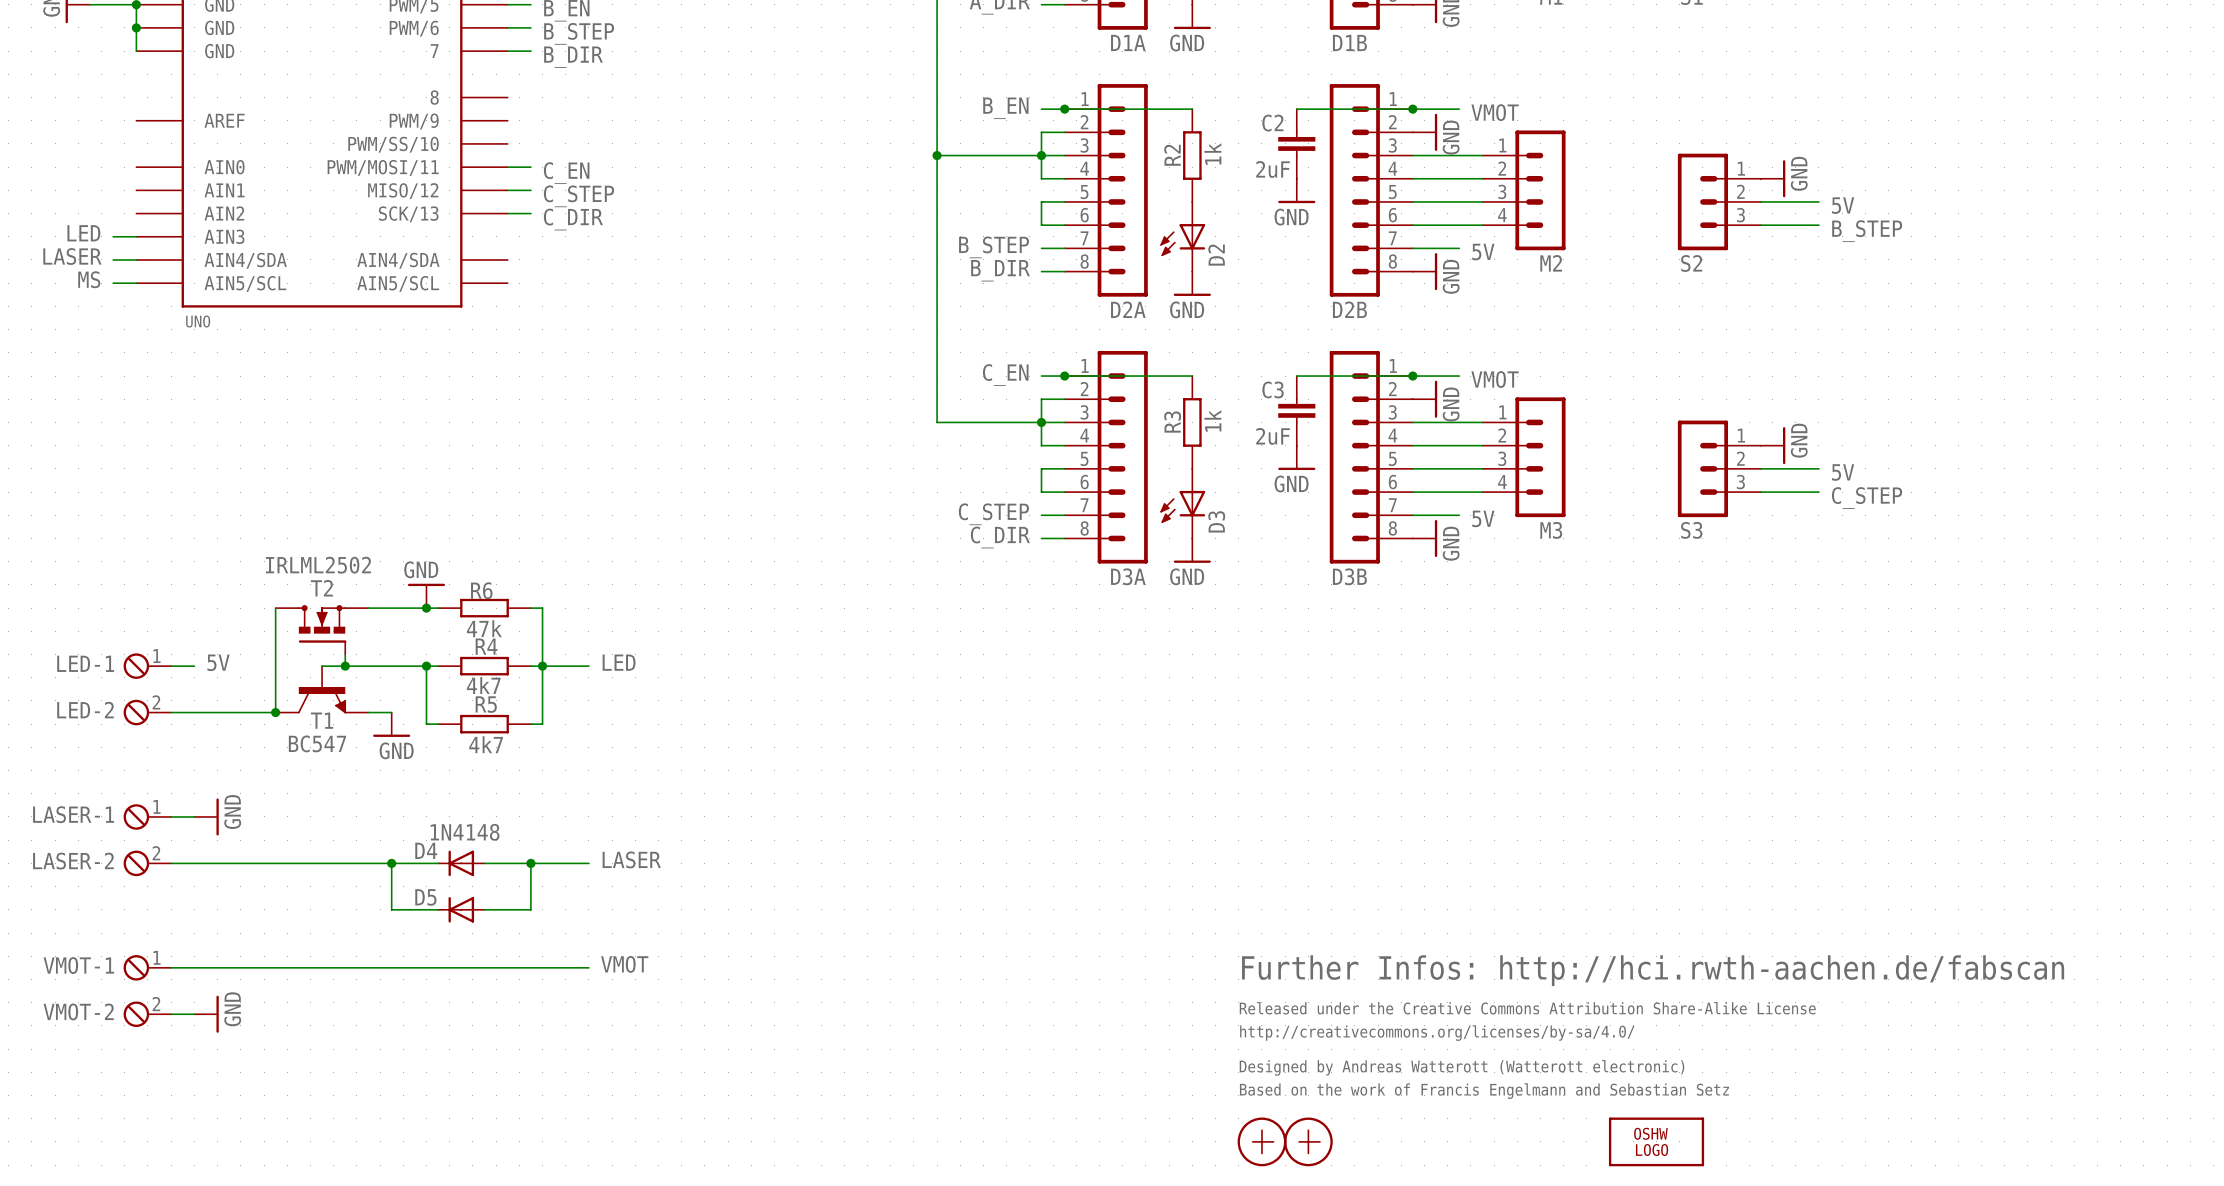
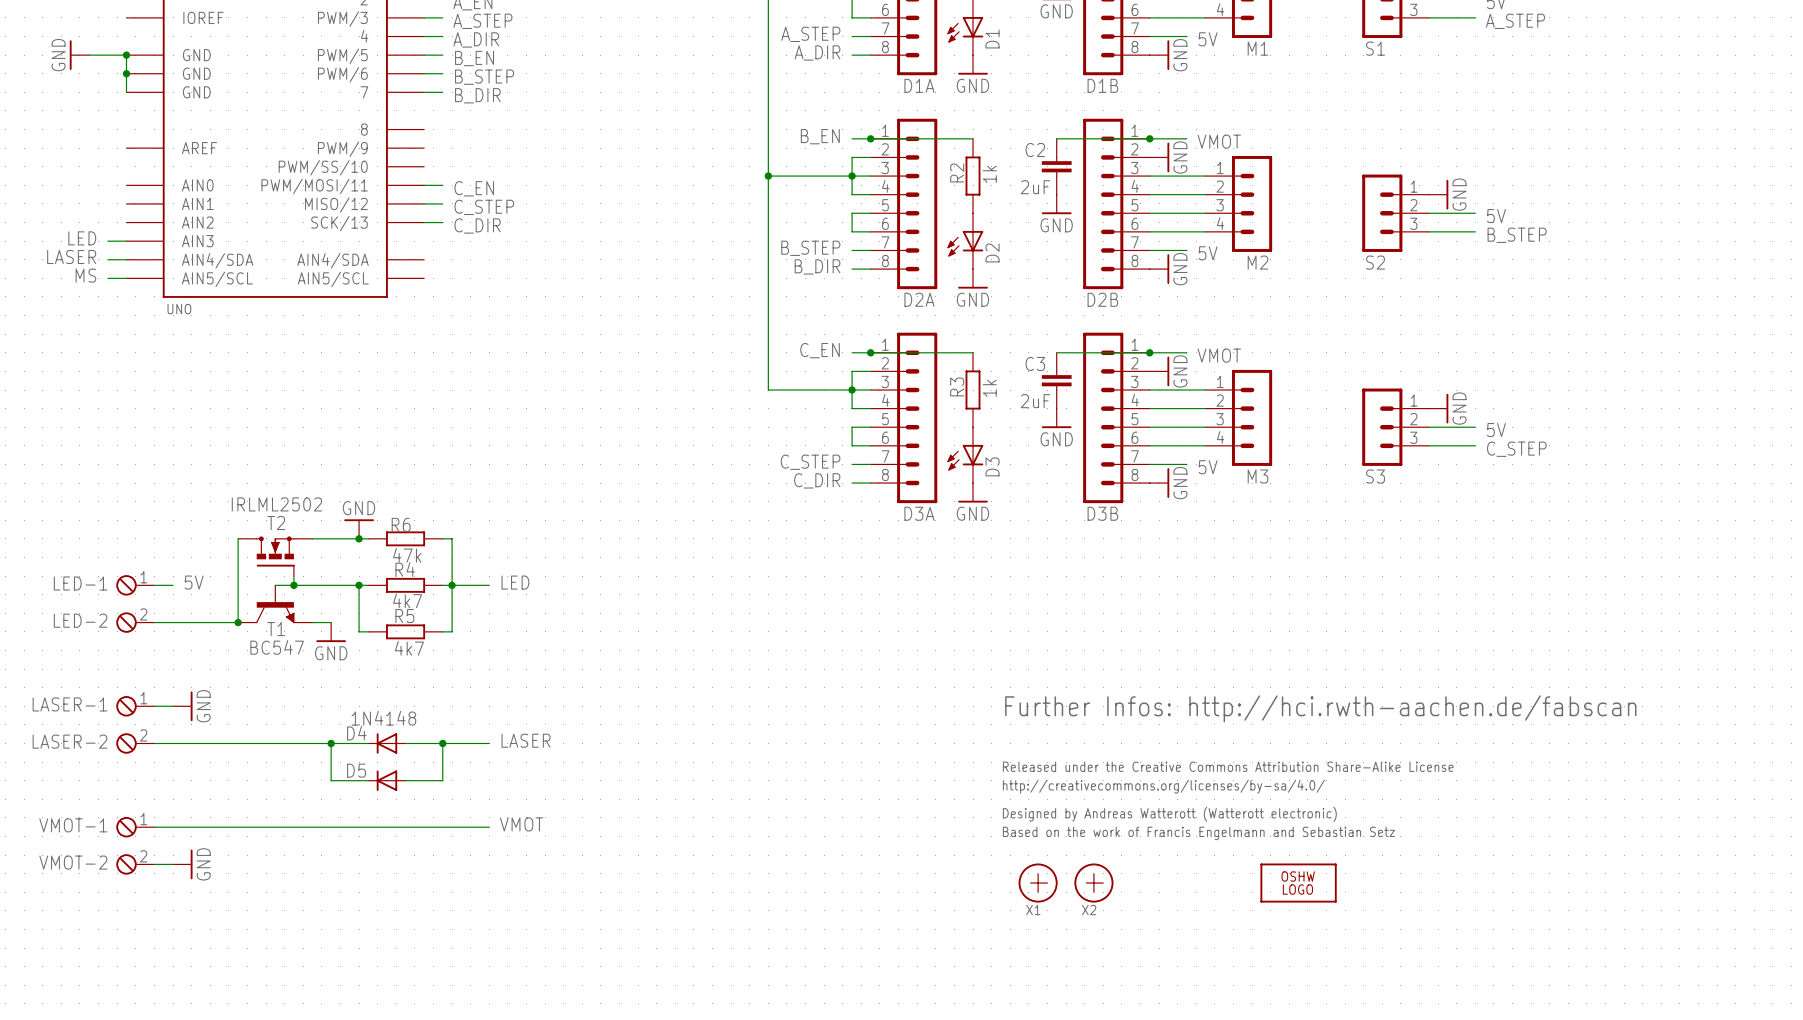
text position: Further Infos: http://hci.rwth-aachen.de/fabscan (1653, 970) -> Further Infos: http://hci.rwth-aachen.de/fabscan (1320, 708)
text position: Released under the Creative Commons Attribution Share-Alike License (1527, 1008) -> Released under the Creative Commons Attribution Share-Alike License (1228, 766)
text position: http://creativecommons.org/licenses/by-sa/4.0/ (1437, 1033) -> http://creativecommons.org/licenses/by-sa/4.0/ (1163, 786)
X1: none -> (1038, 883)
X2: none -> (1093, 883)
text position: Designed by Andreas Watterott (Watterott electronic) (1461, 1067) -> Designed by Andreas Watterott (Watterott electronic) (1169, 814)
text position: Based on the work of Francis Engelmann and Sebastian Setz (1484, 1091) -> Based on the work of Francis Engelmann and Sebastian Setz (1198, 833)
part: (1261, 1141) -> none
part: (1308, 1141) -> none
part position: (1656, 1141) -> (1298, 883)

